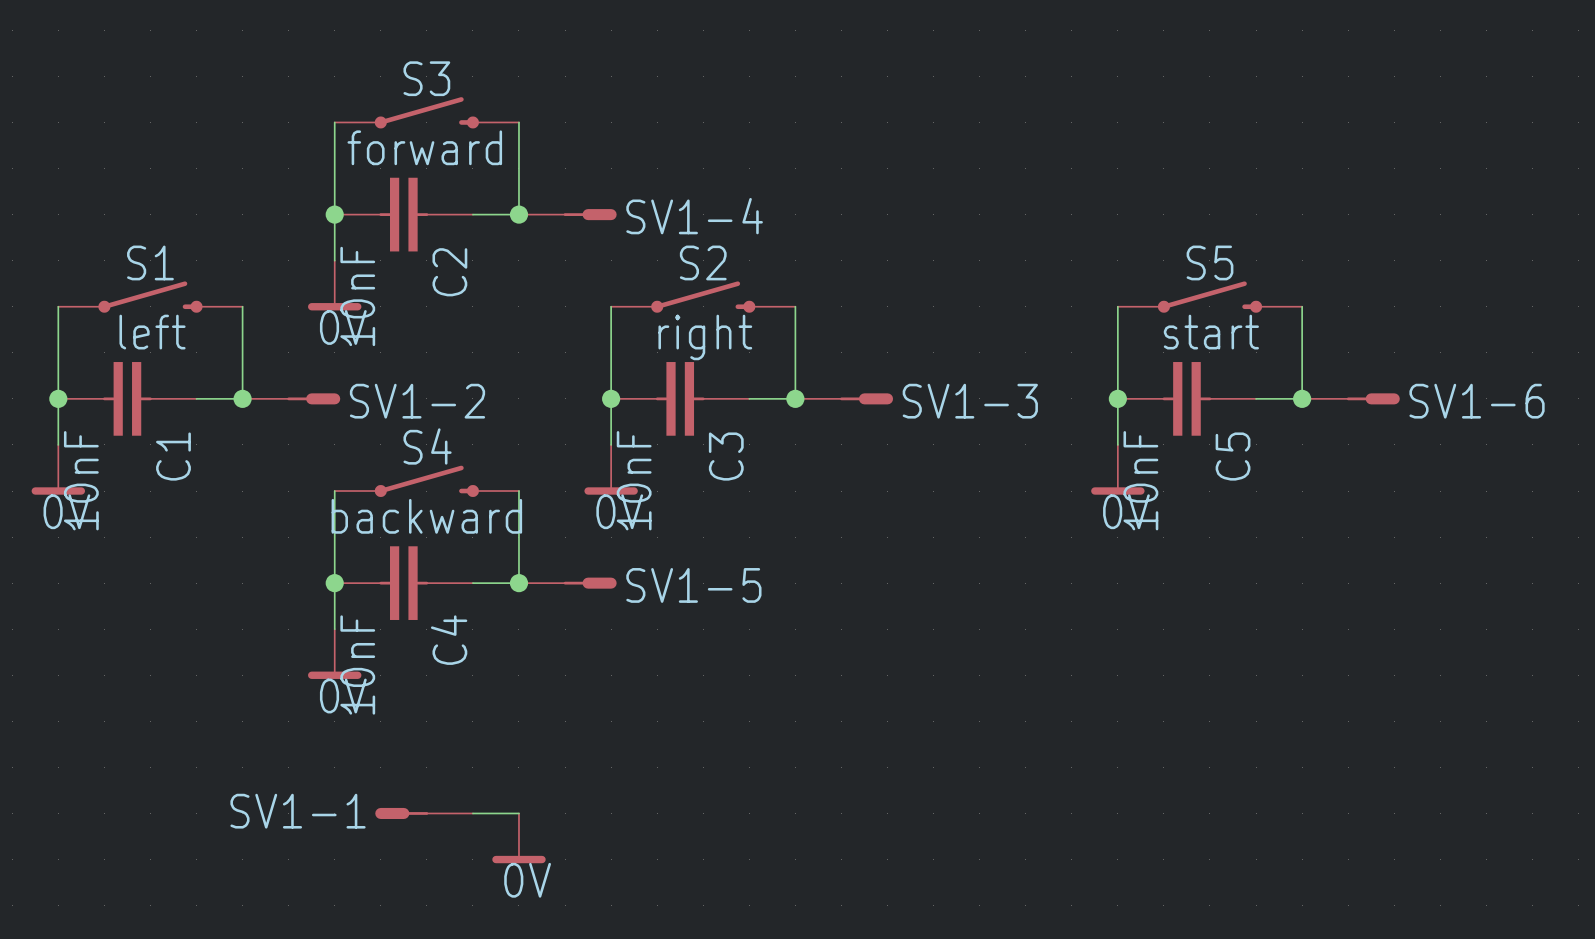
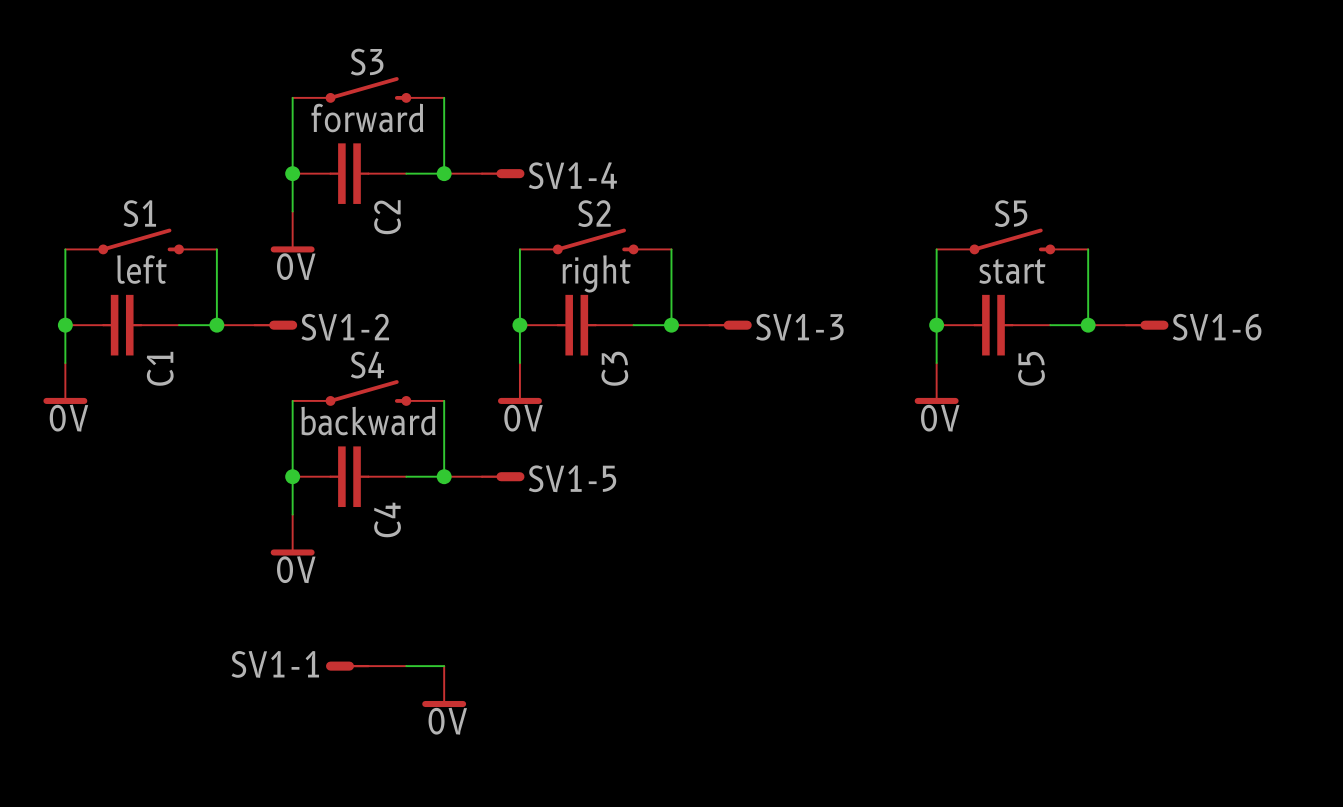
C2 value: 10nF (357, 296) -> none
C1 value: 10nF (81, 480) -> none
C3 value: 10nF (634, 480) -> none
C5 value: 10nF (1140, 480) -> none
C4 value: 10nF (357, 664) -> none

